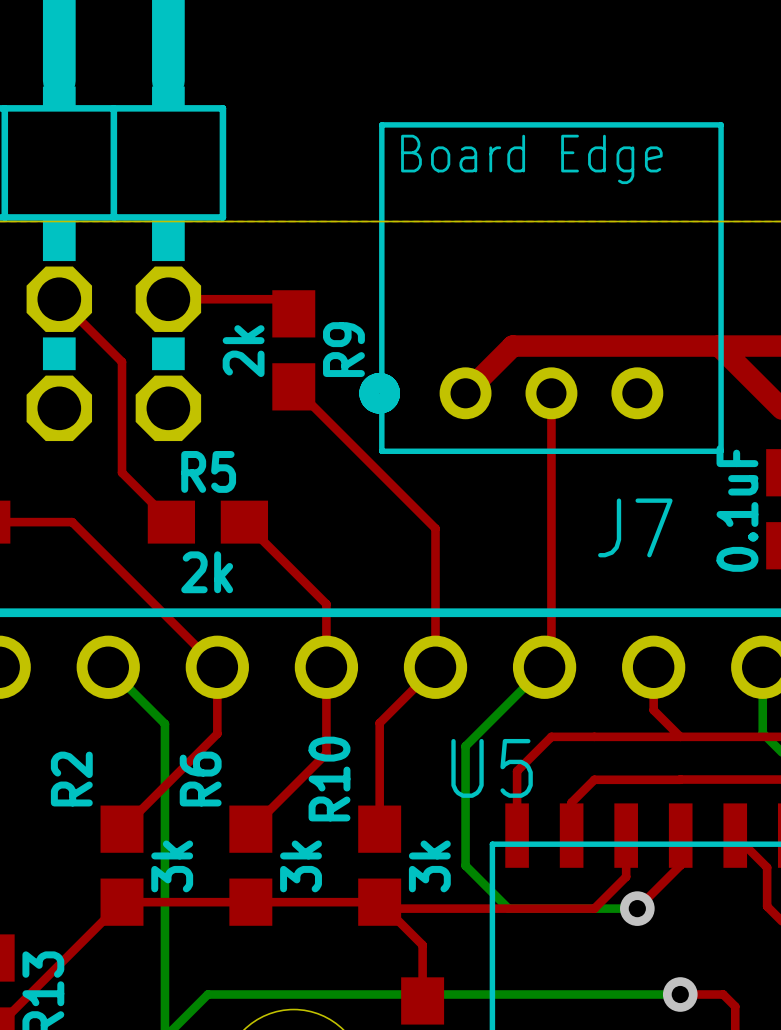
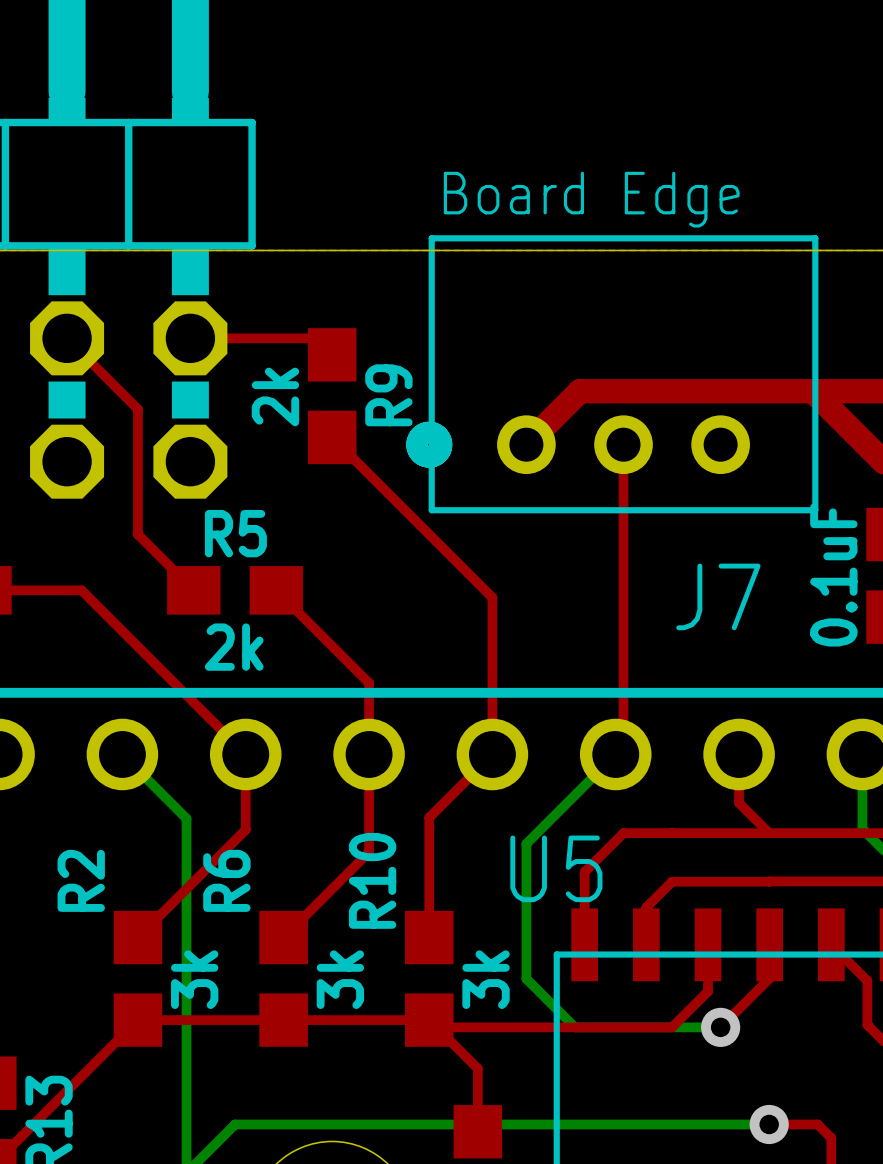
J7 footprint: [379, 122, 724, 454] -> [428, 235, 819, 514]

